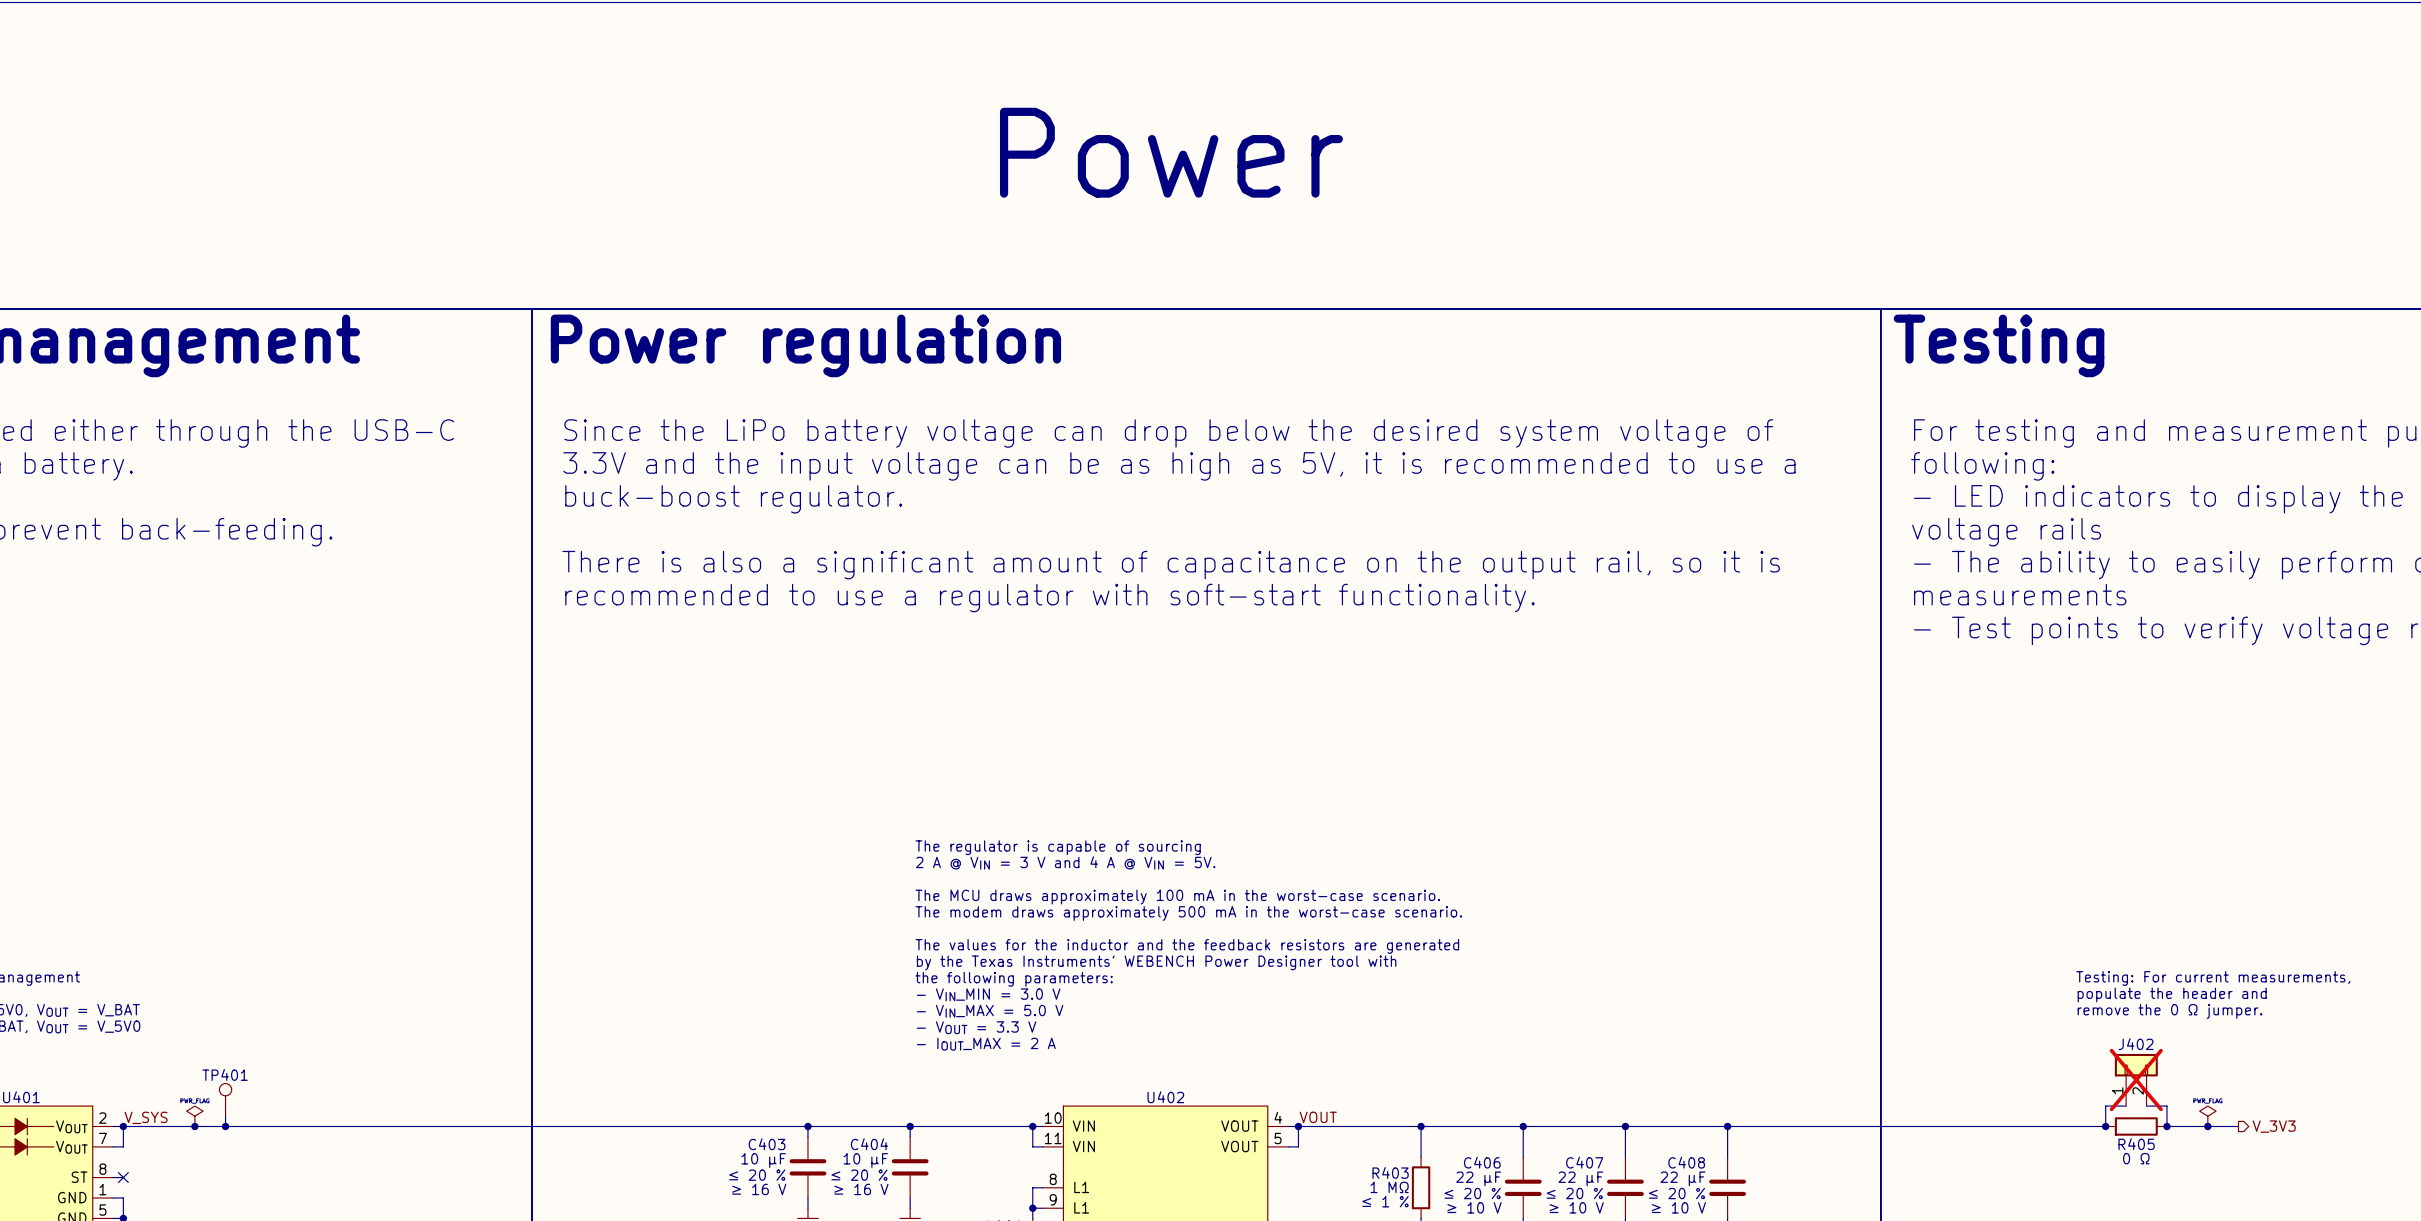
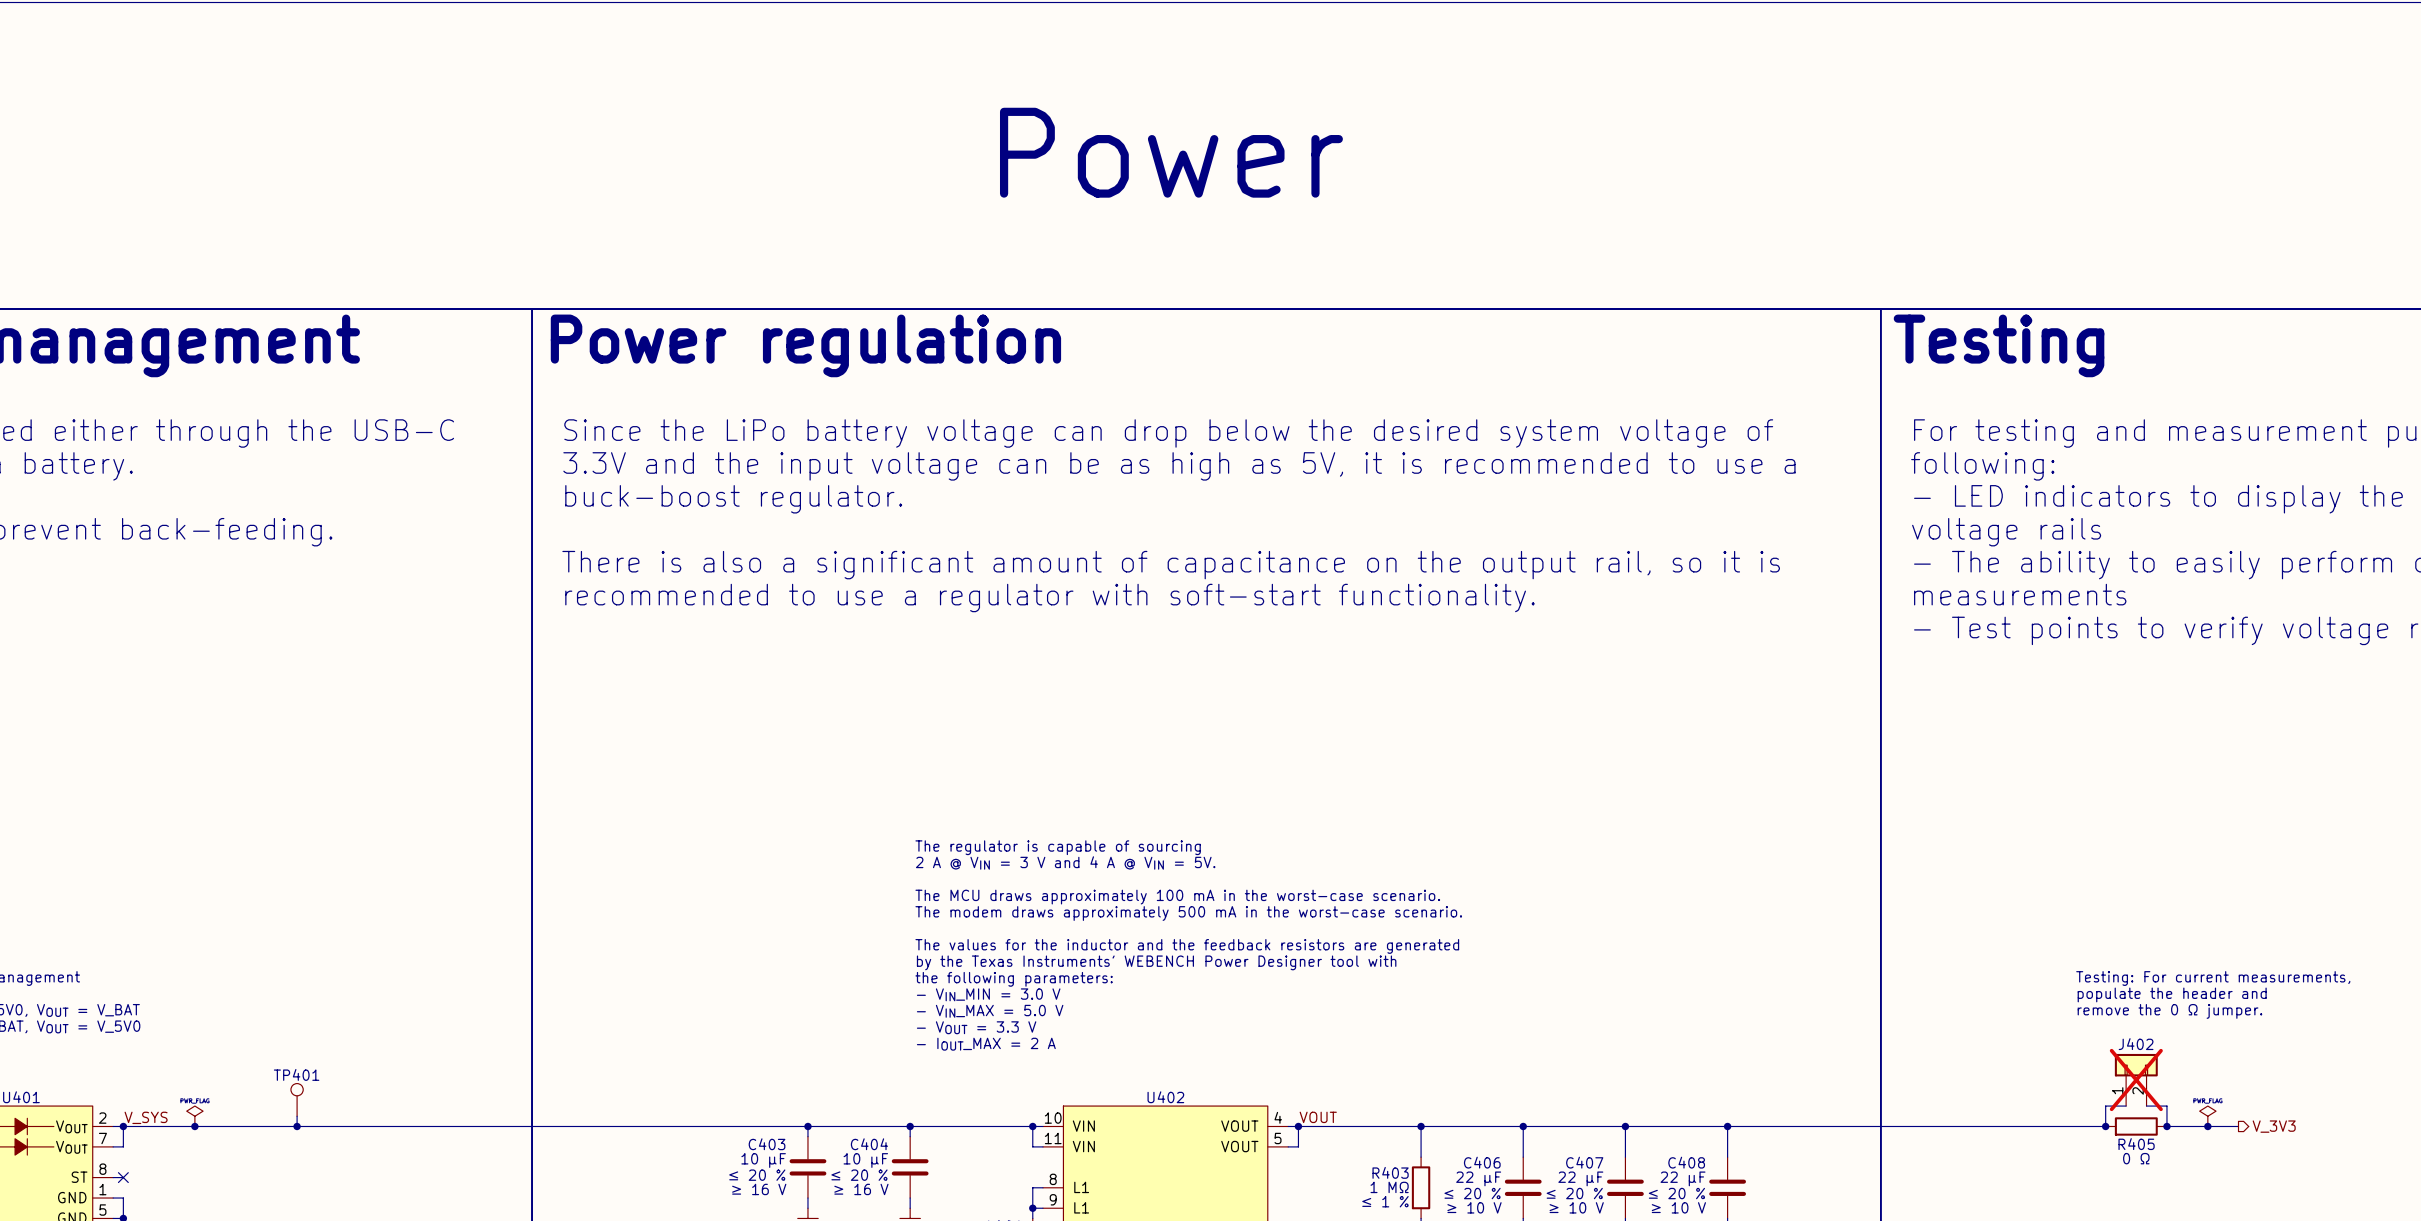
TP401 position: (225, 1099) -> (297, 1099)
wire: (225, 1116) (225, 1126) -> (297, 1116) (297, 1126)
junction: (225, 1126) -> none
junction: none -> (297, 1126)

